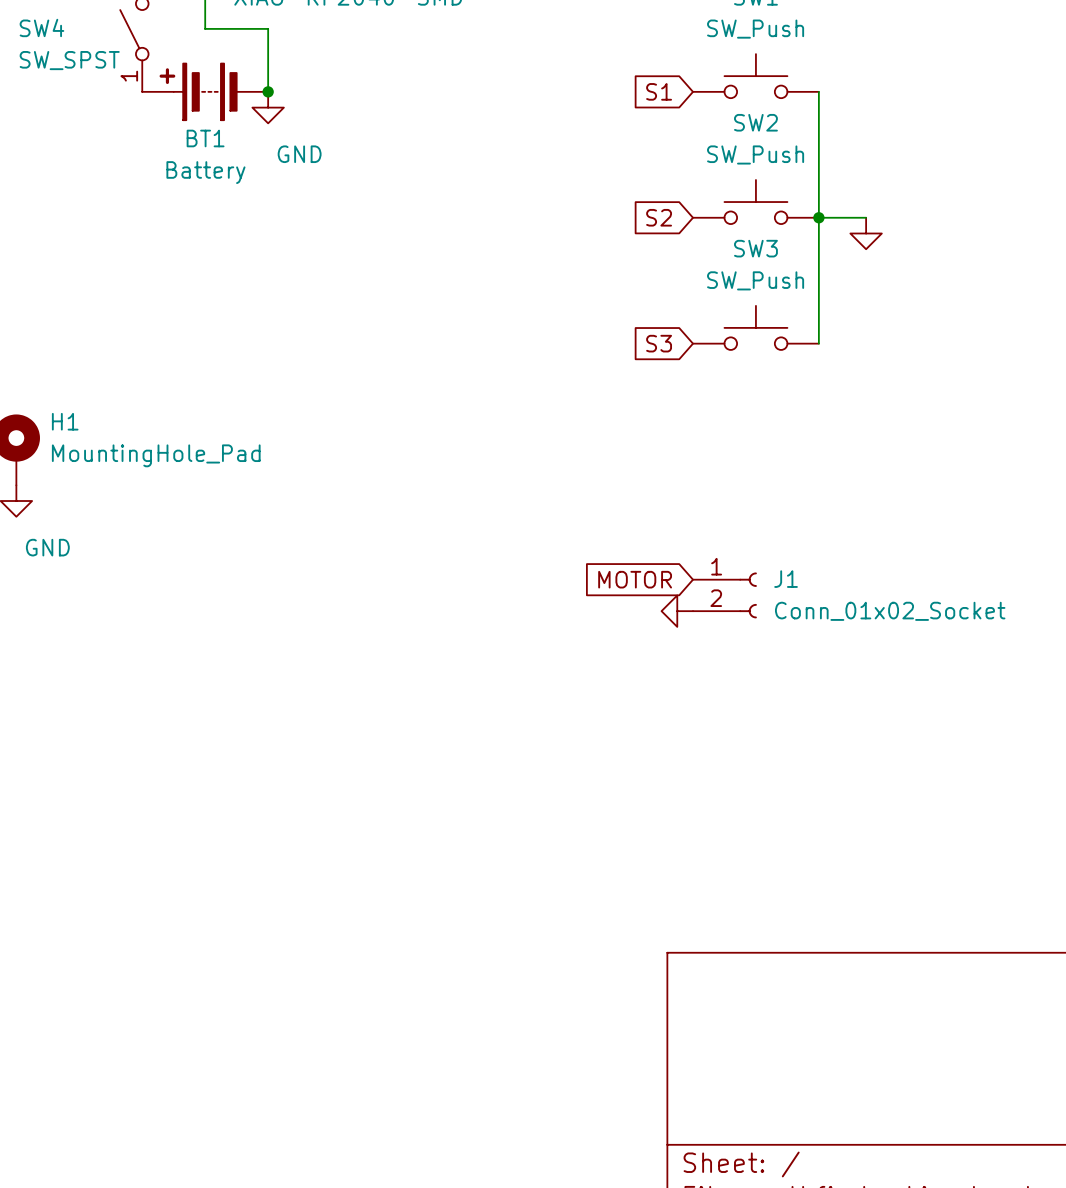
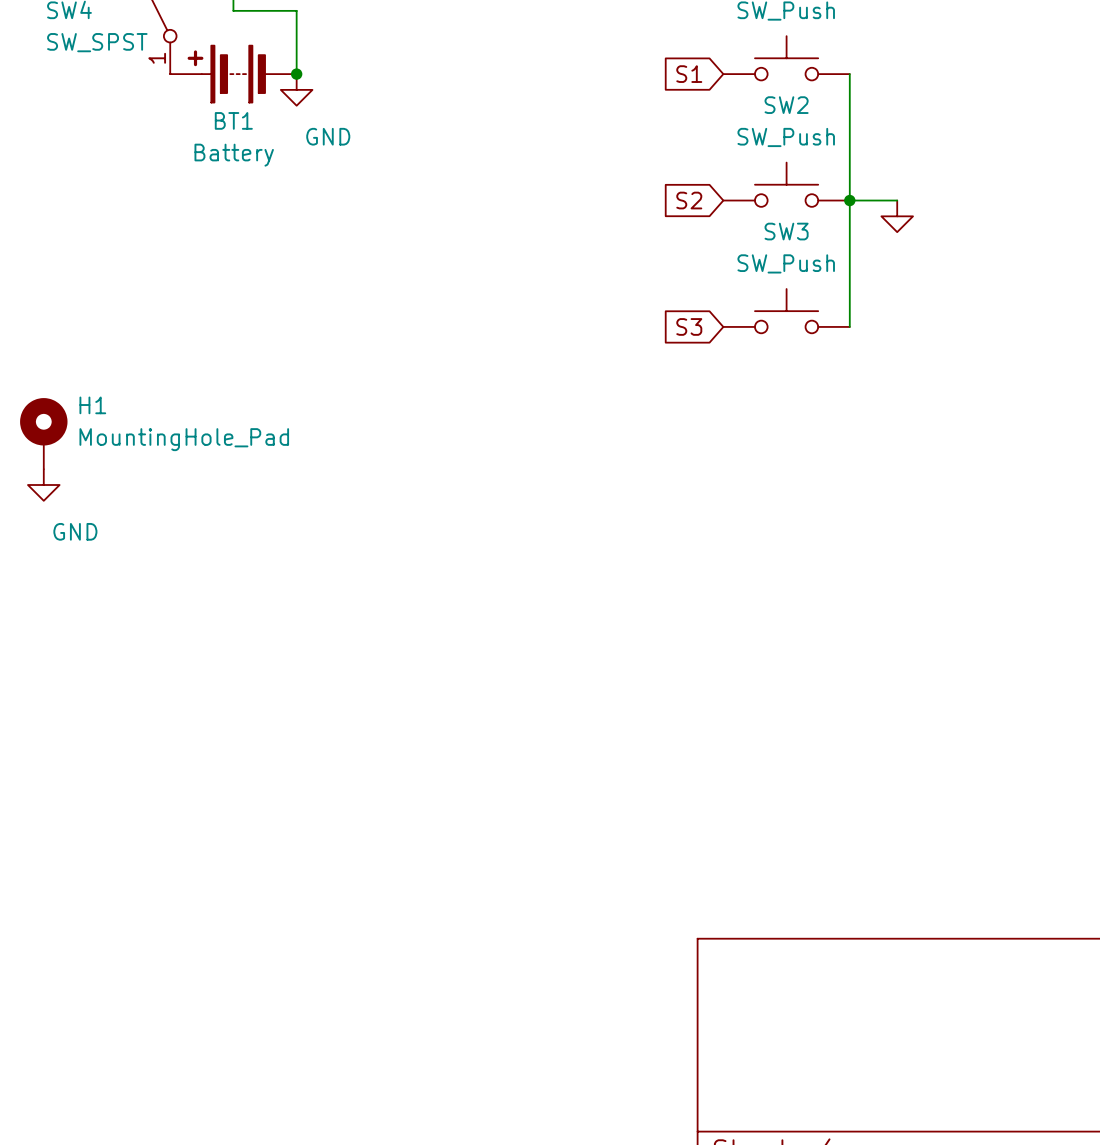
global label: MOTOR (635, 579) -> none
J1: Conn_01x02_Socket (724, 595) -> none
power symbol: (677, 611) -> none

